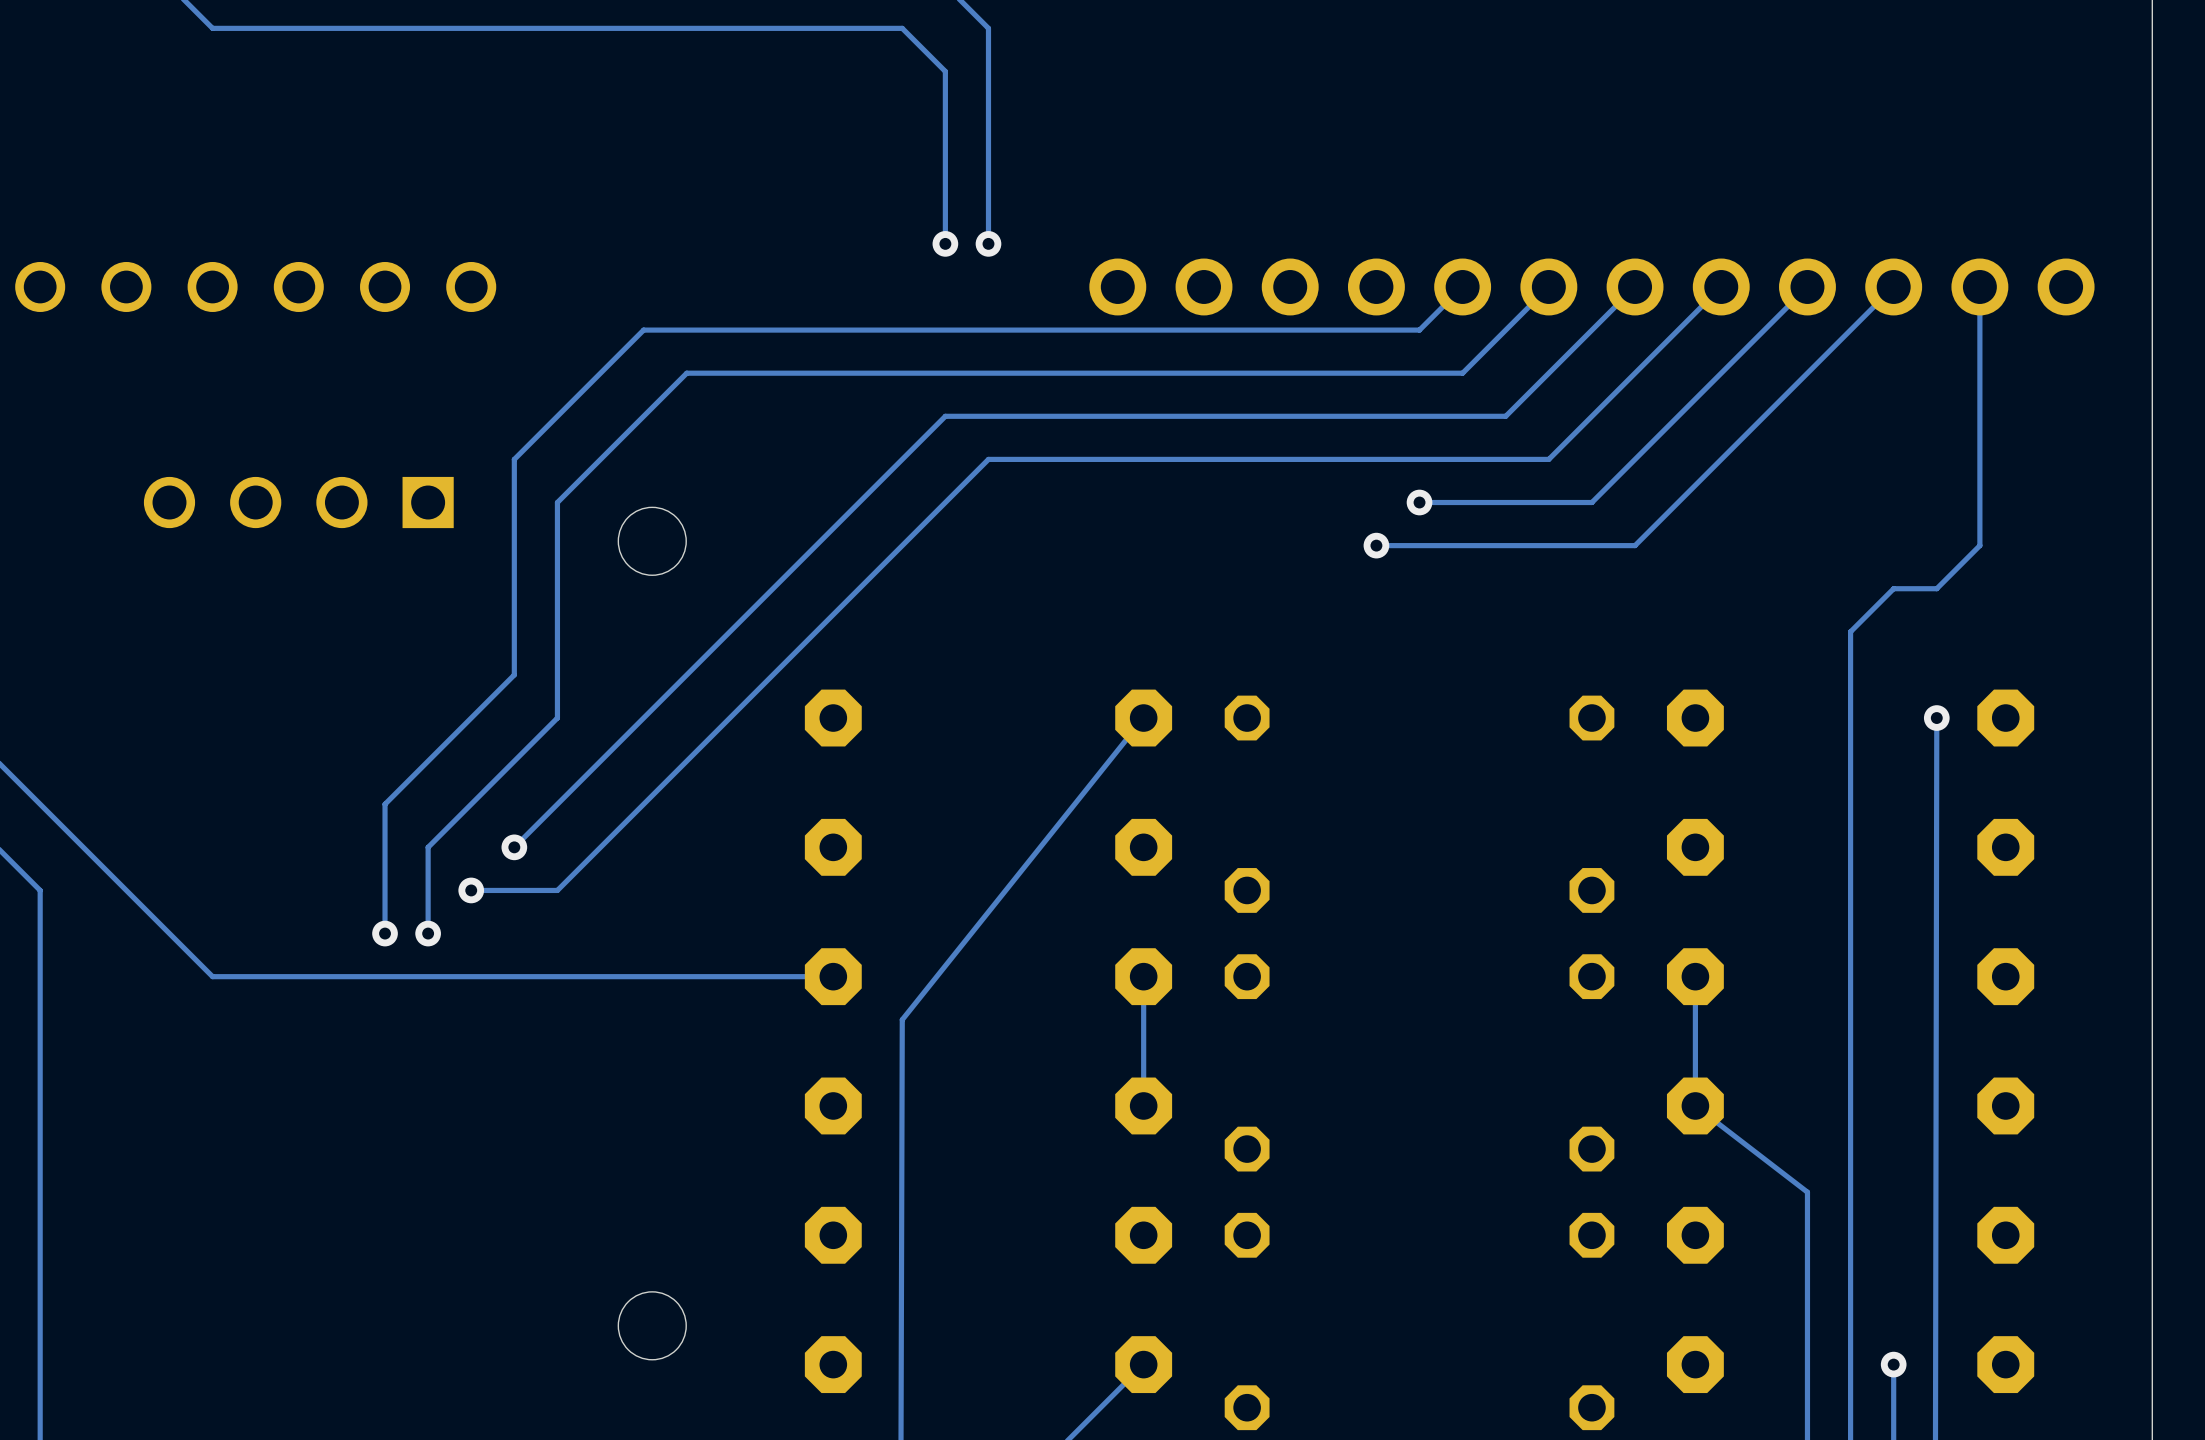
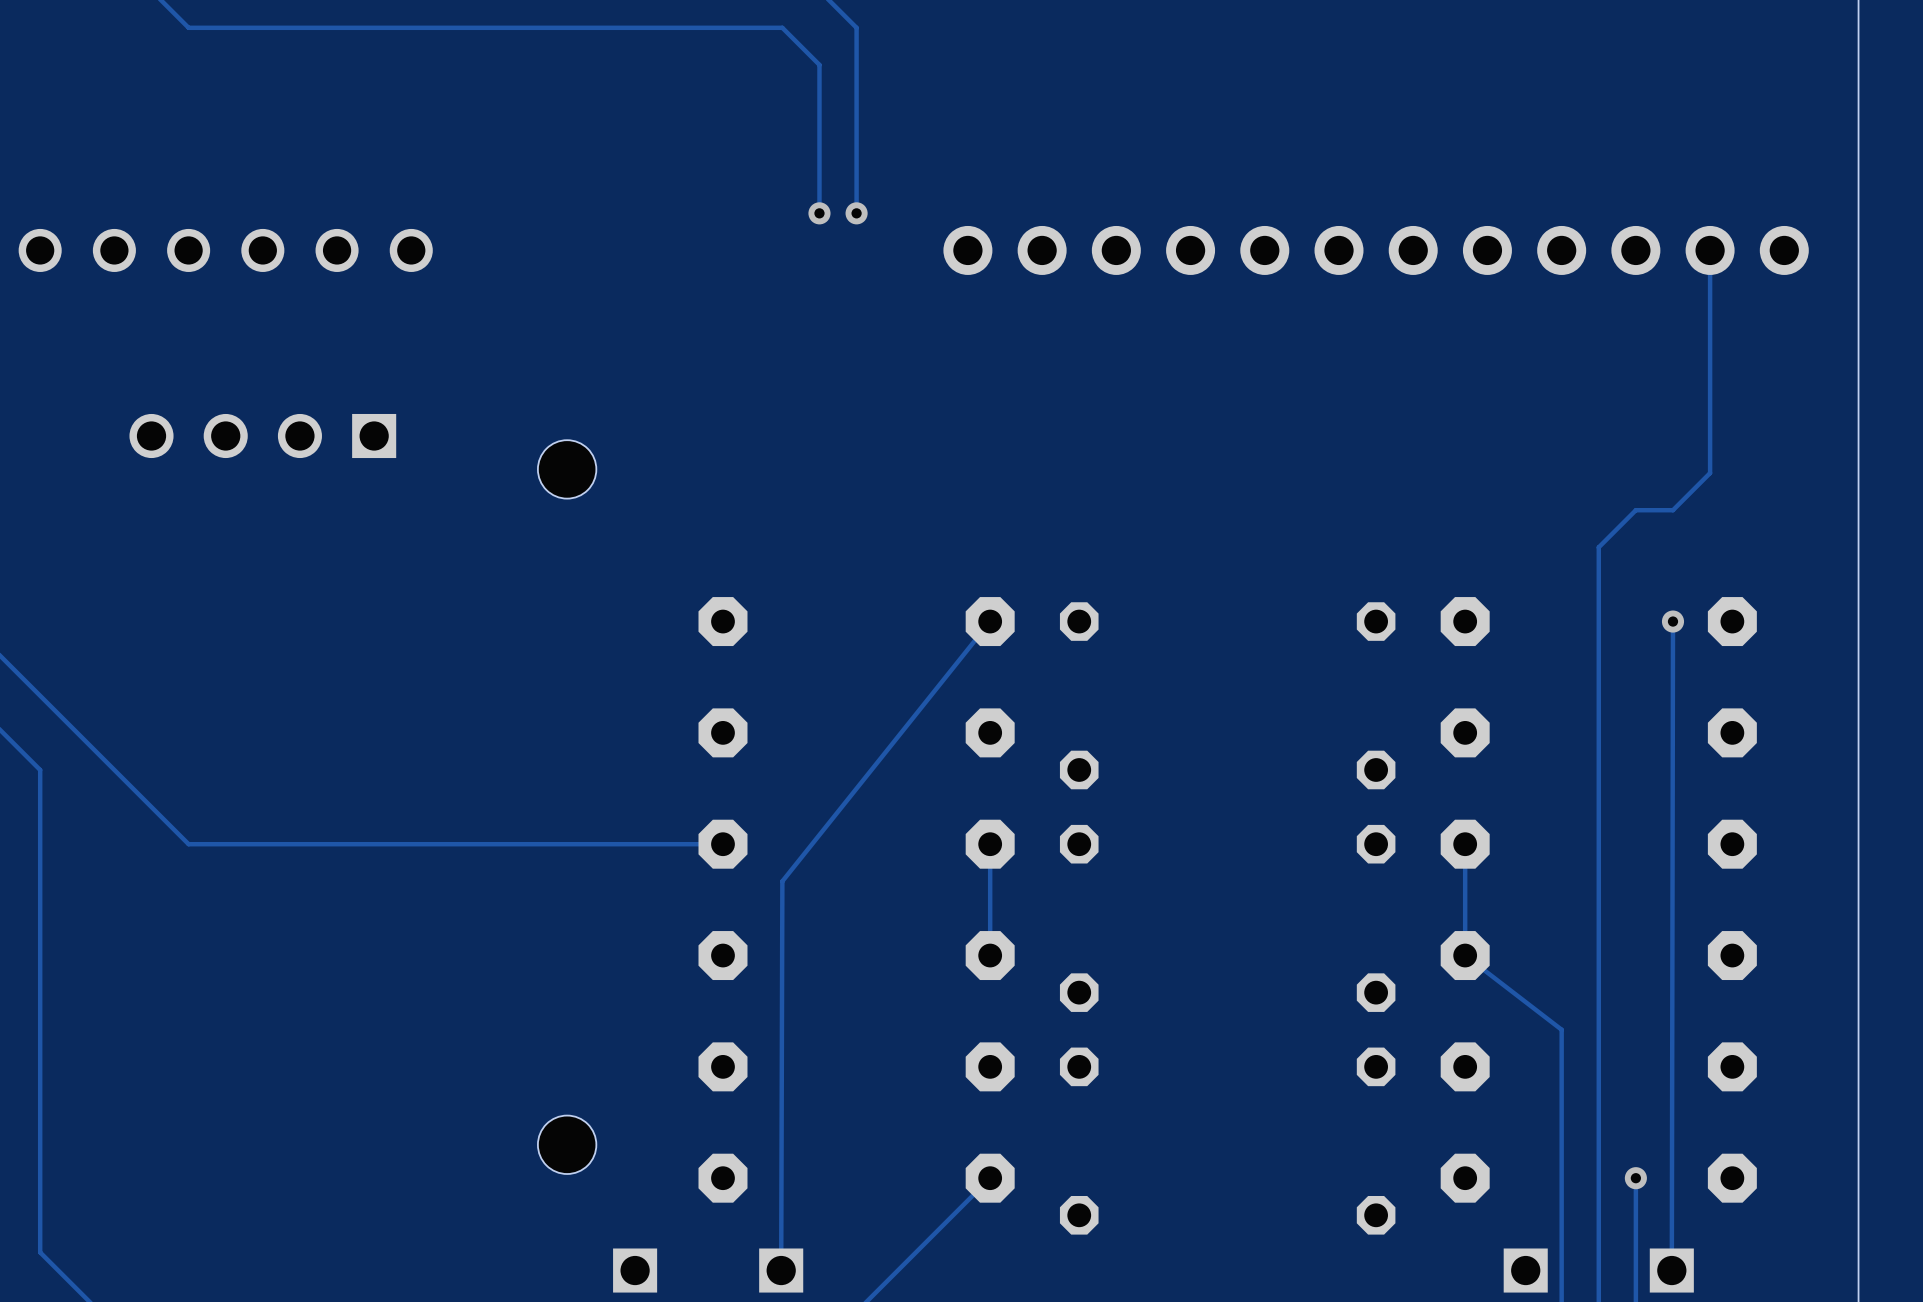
track: (1462, 286) (1419, 330) (643, 330) (514, 459) (514, 674) (385, 804) (385, 933) -> none
track: (1548, 286) (1462, 373) (686, 373) (557, 502) (557, 718) (428, 847) (428, 933) -> none
track: (1635, 286) (1505, 416) (945, 416) (514, 847) -> none
track: (1721, 286) (1548, 459) (988, 459) (557, 890) (471, 890) -> none
track: (1807, 286) (1591, 502) (1419, 502) -> none
track: (1893, 286) (1635, 545) (1376, 545) -> none
via: (1419, 502) -> none
via: (1376, 545) -> none
via: (514, 847) -> none
via: (471, 890) -> none
via: (385, 933) -> none
via: (428, 933) -> none

